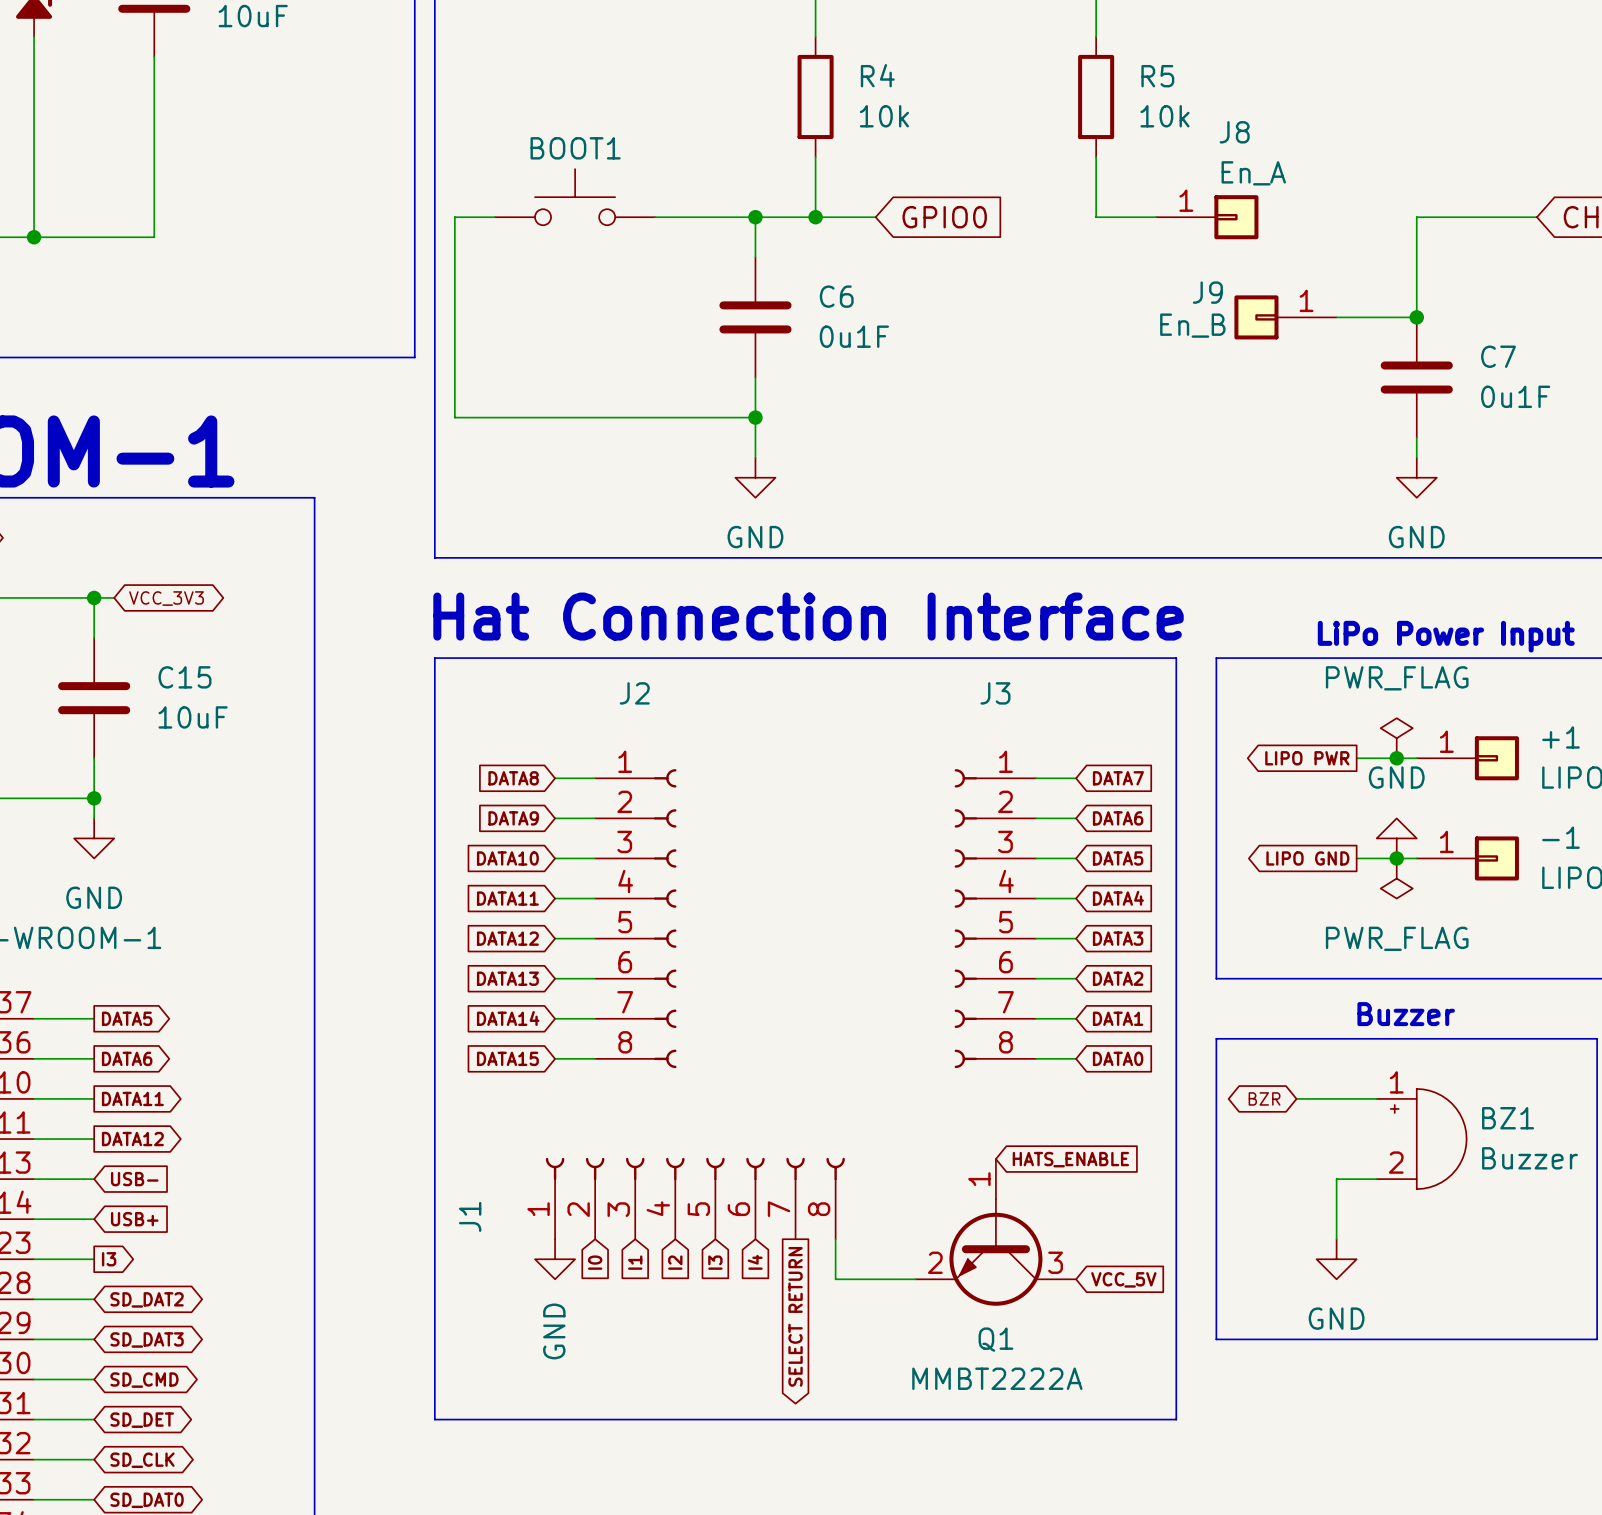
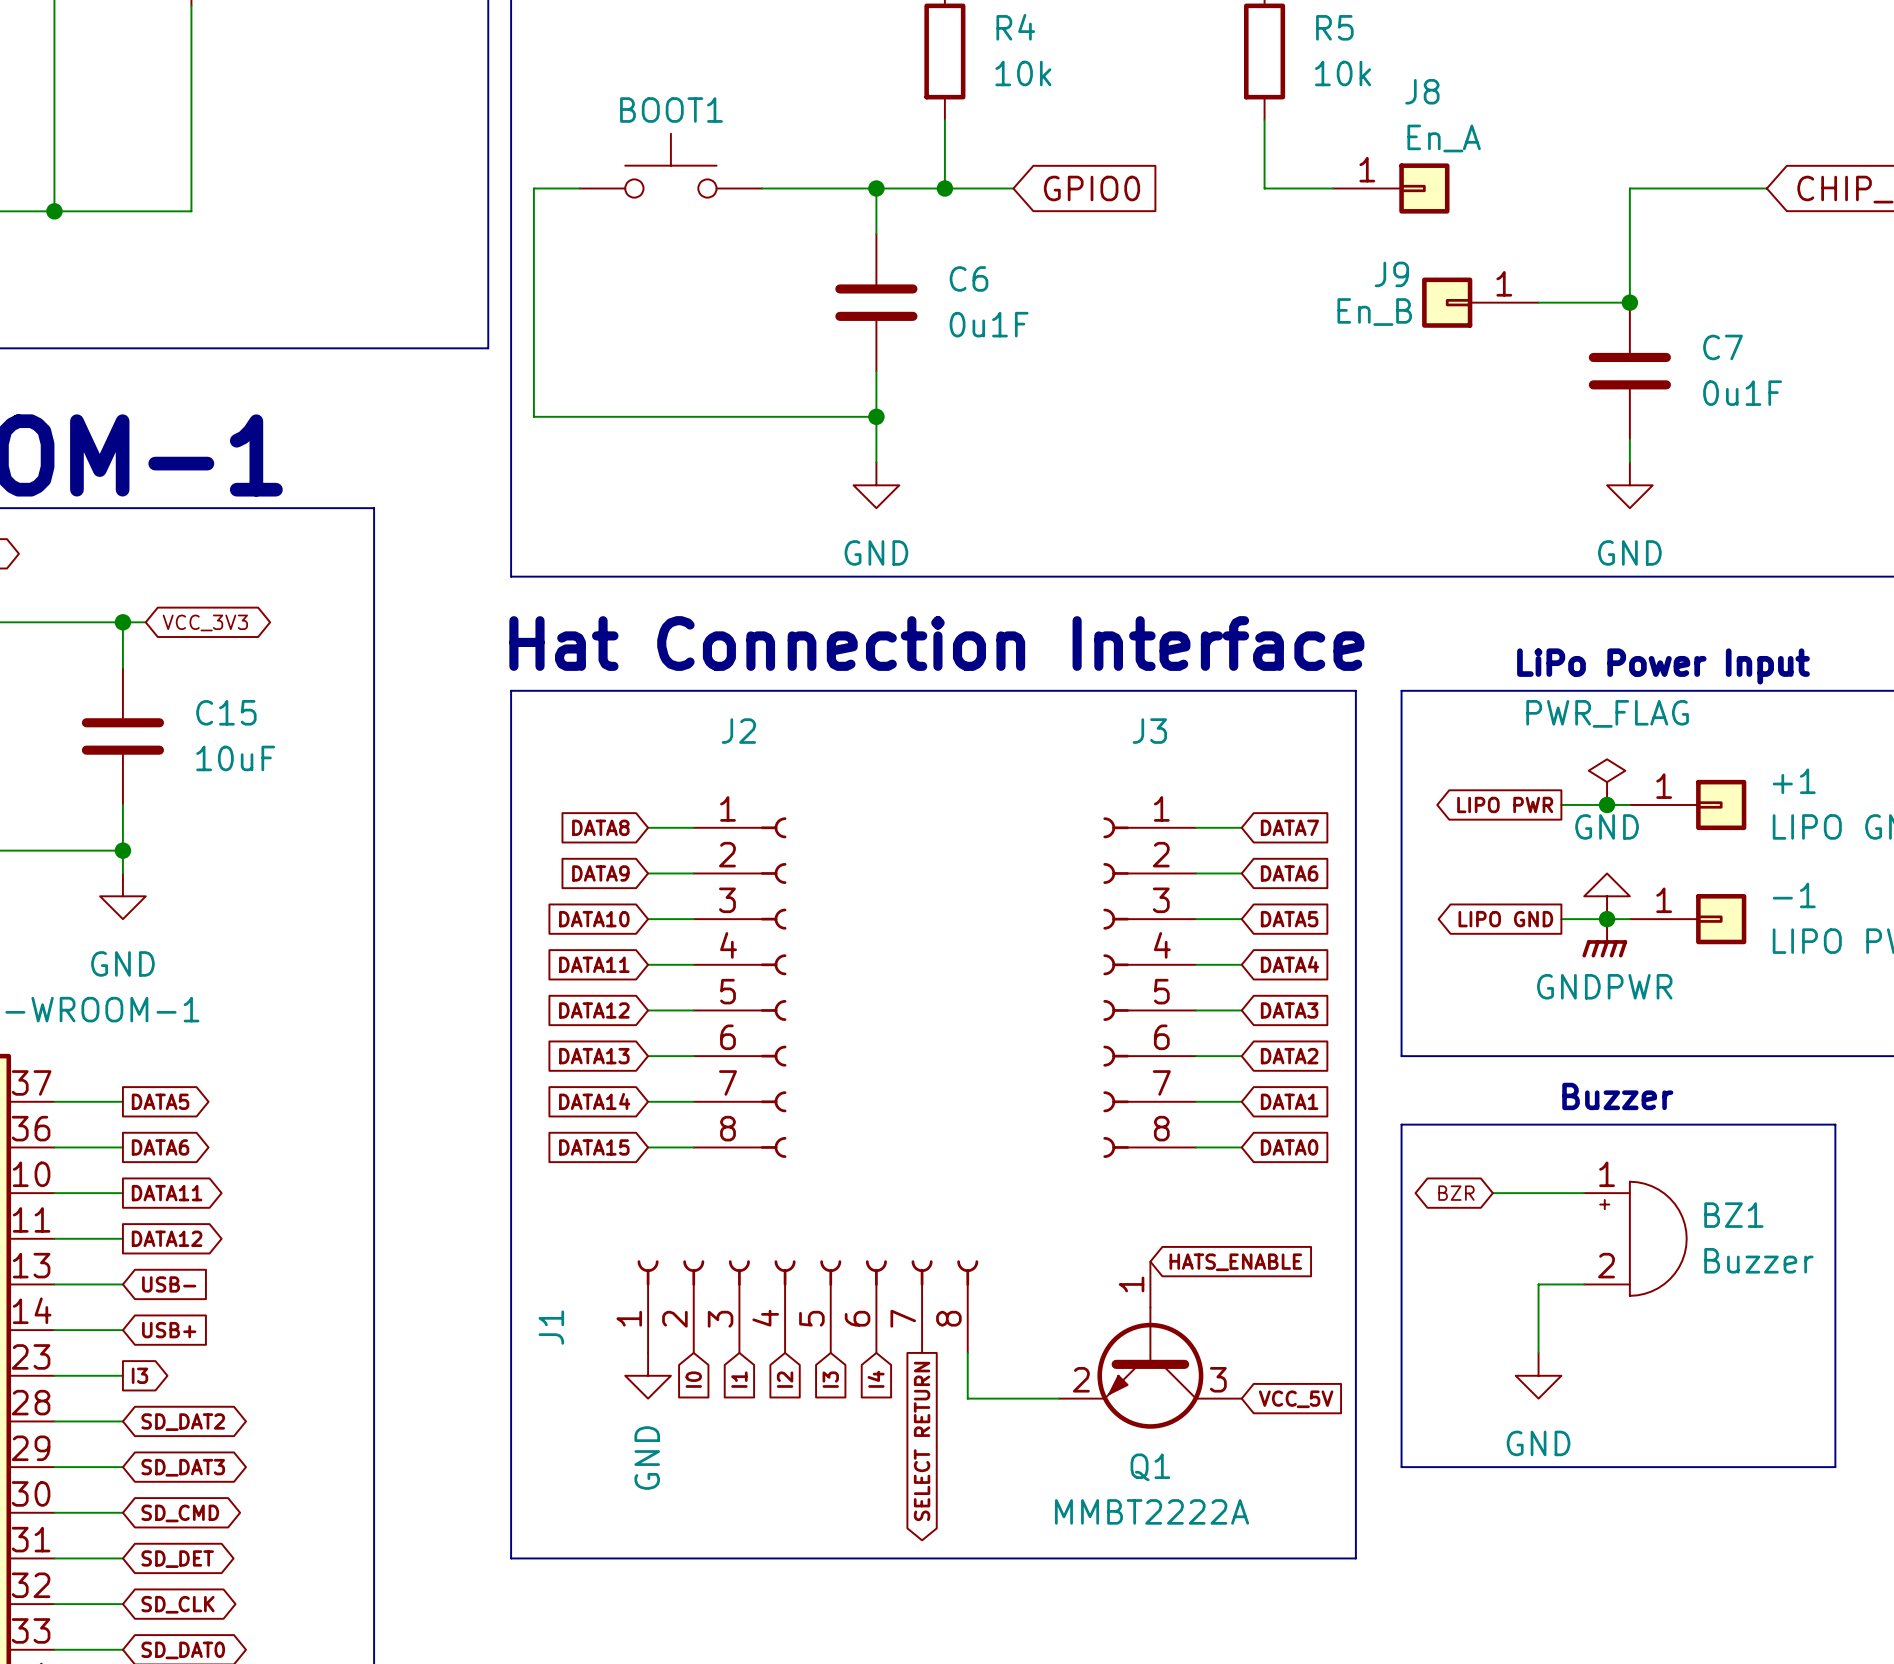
power symbol: PWR_FLAG (1396, 878) -> GNDPWR (1604, 938)

